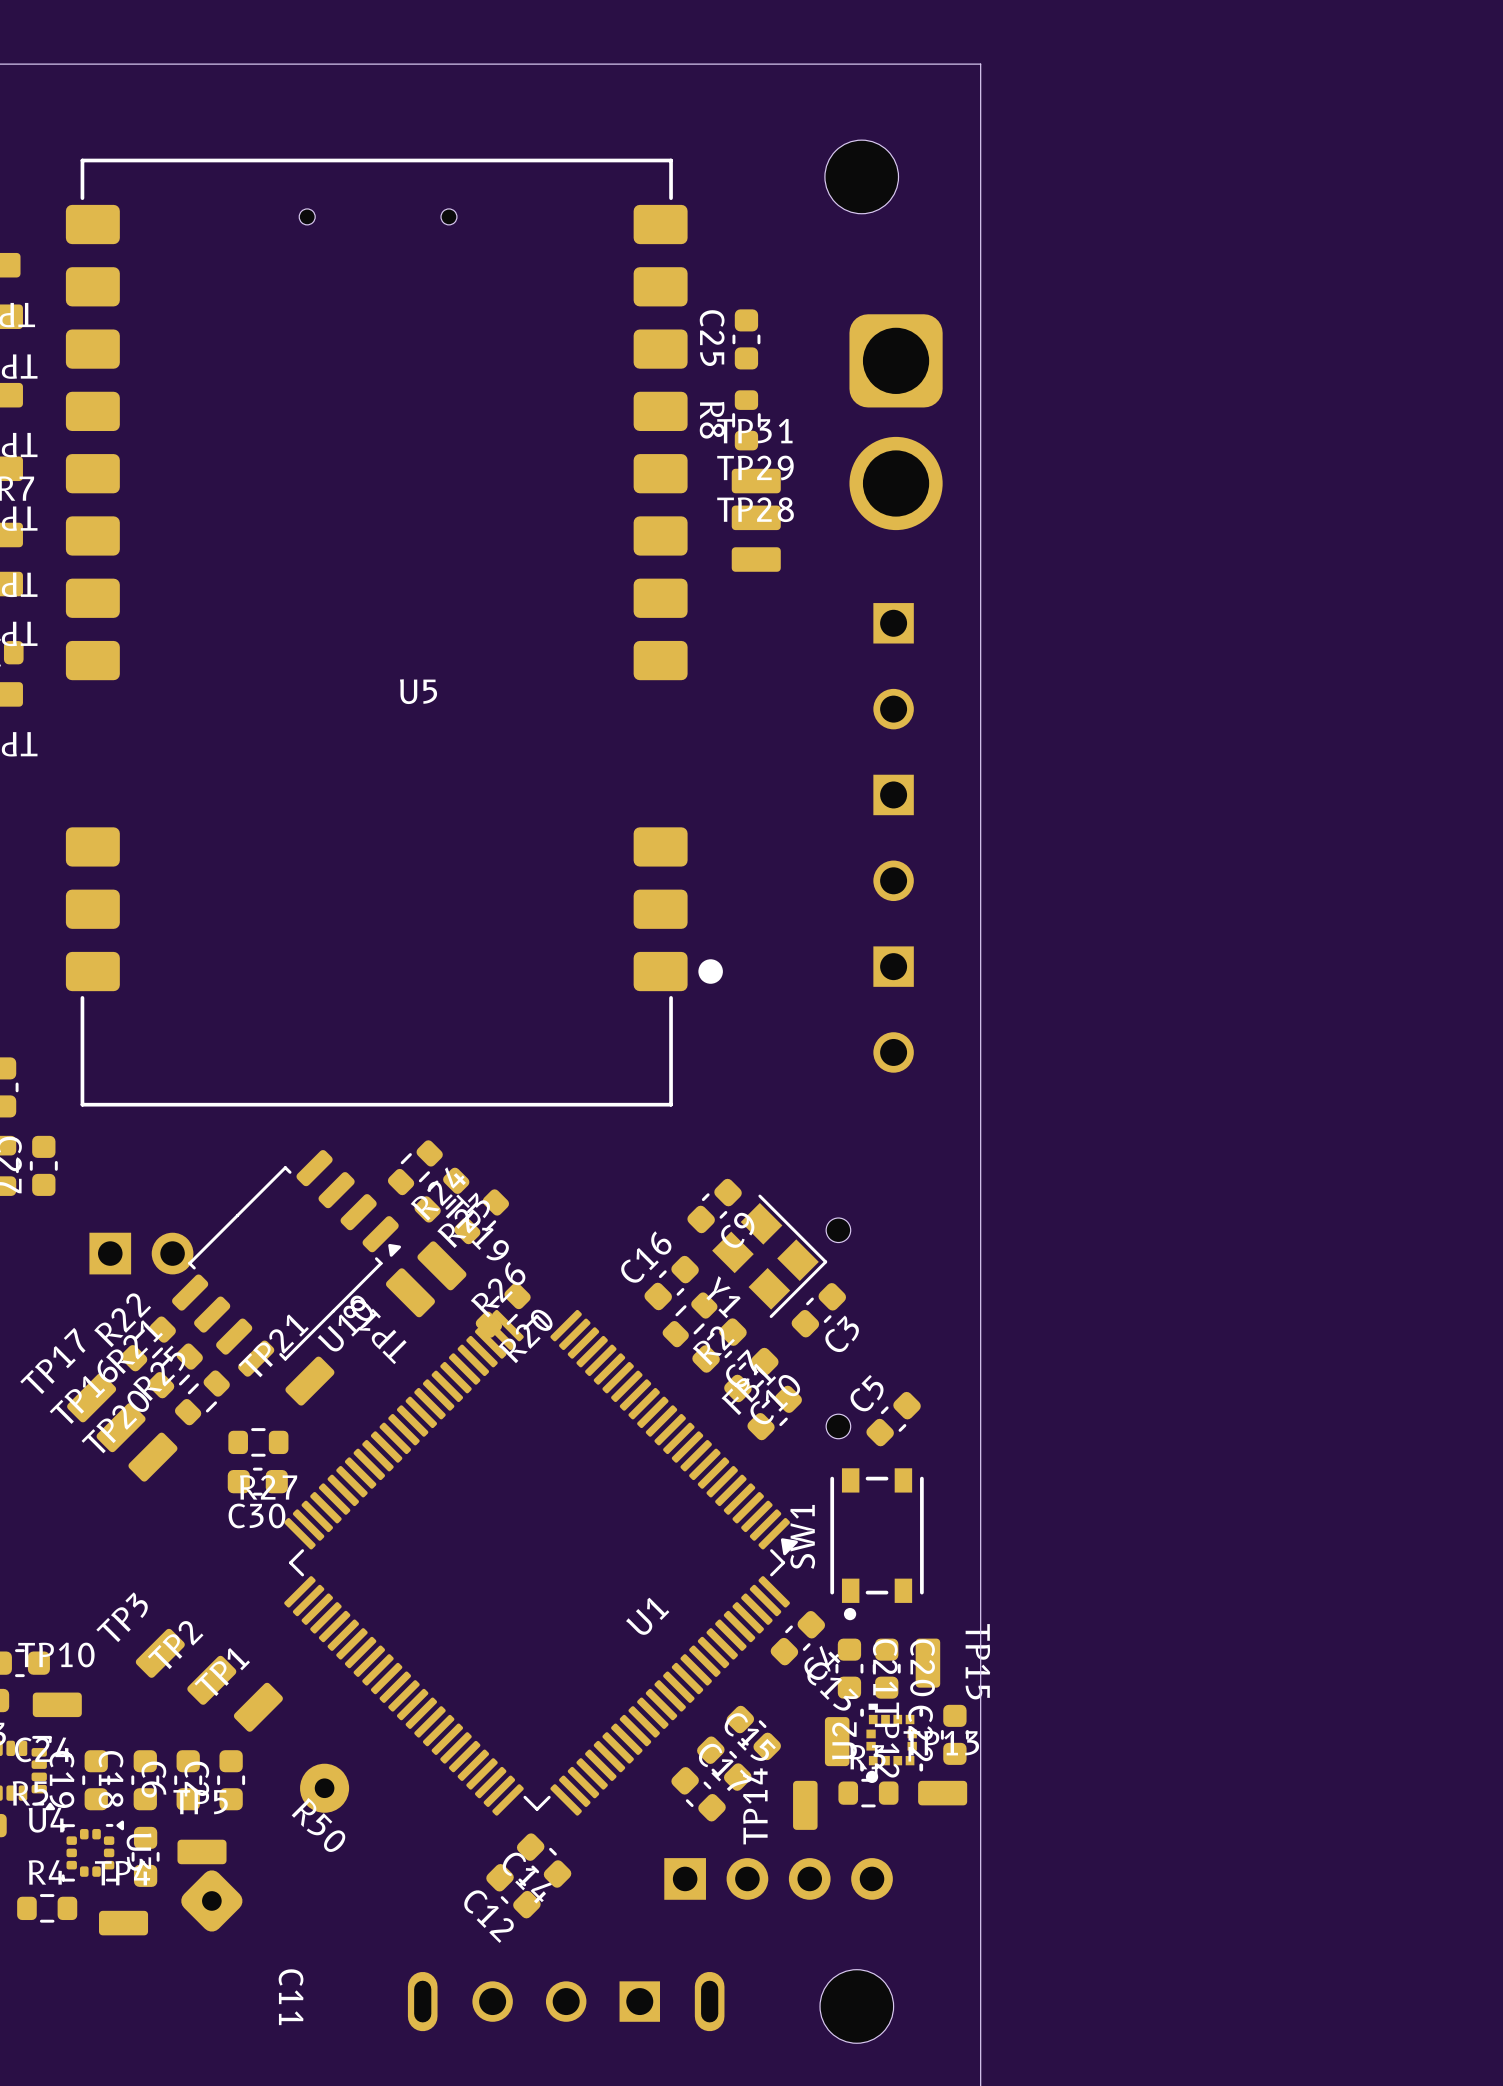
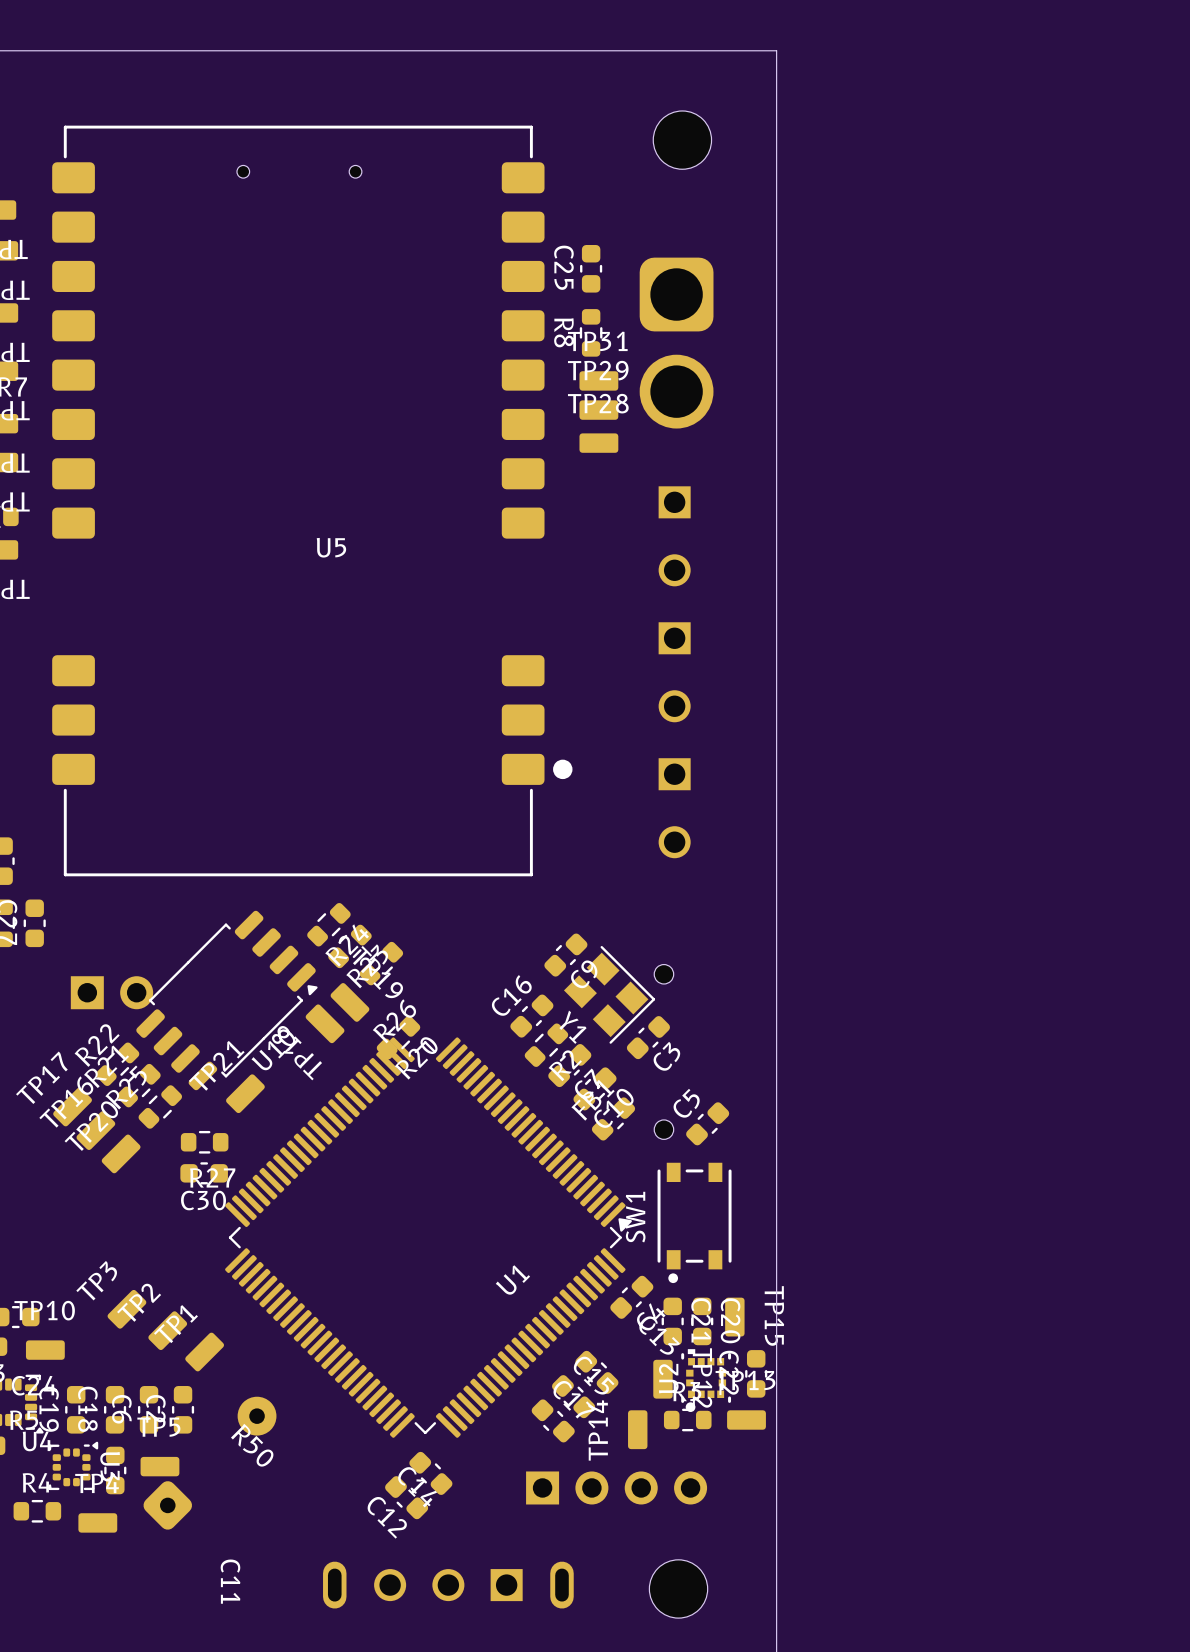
part position: (896, 422) -> (676, 343)
part position: (893, 666) -> (674, 536)
part position: (893, 837) -> (674, 672)
part position: (893, 1009) -> (674, 808)

